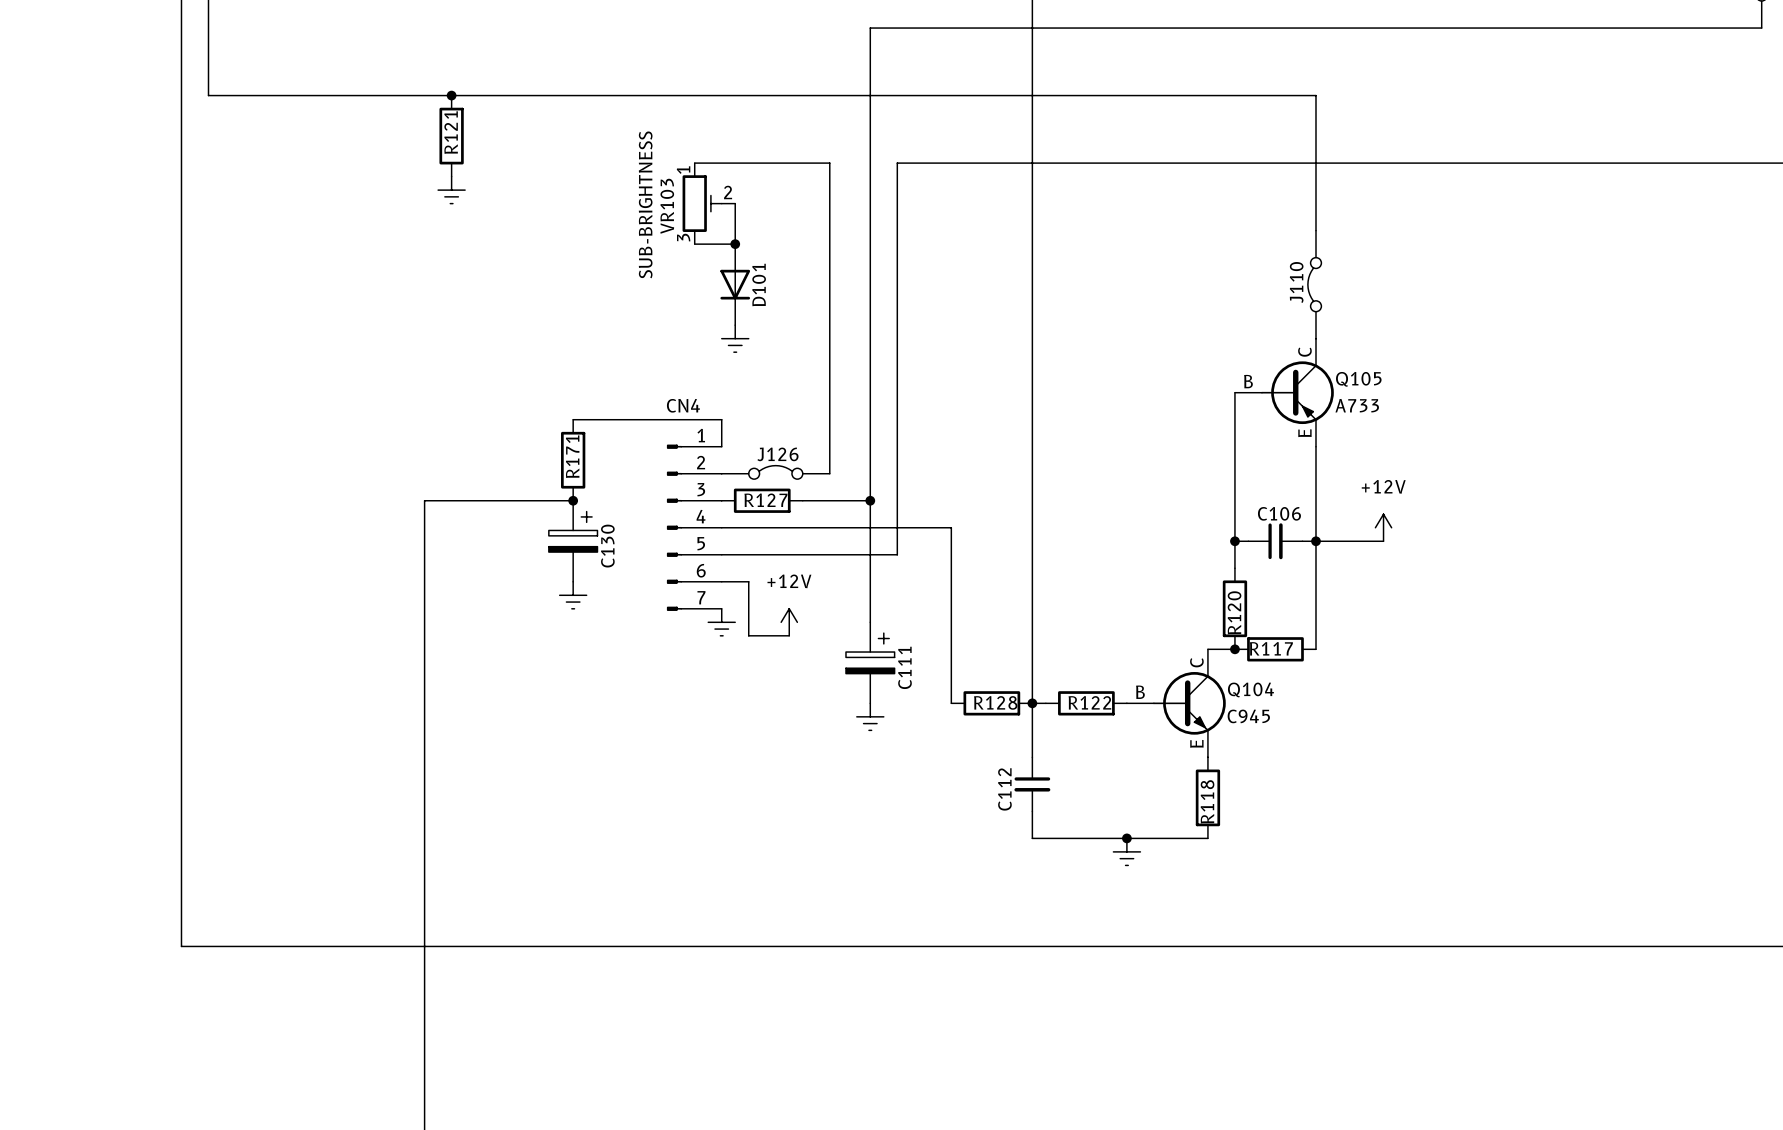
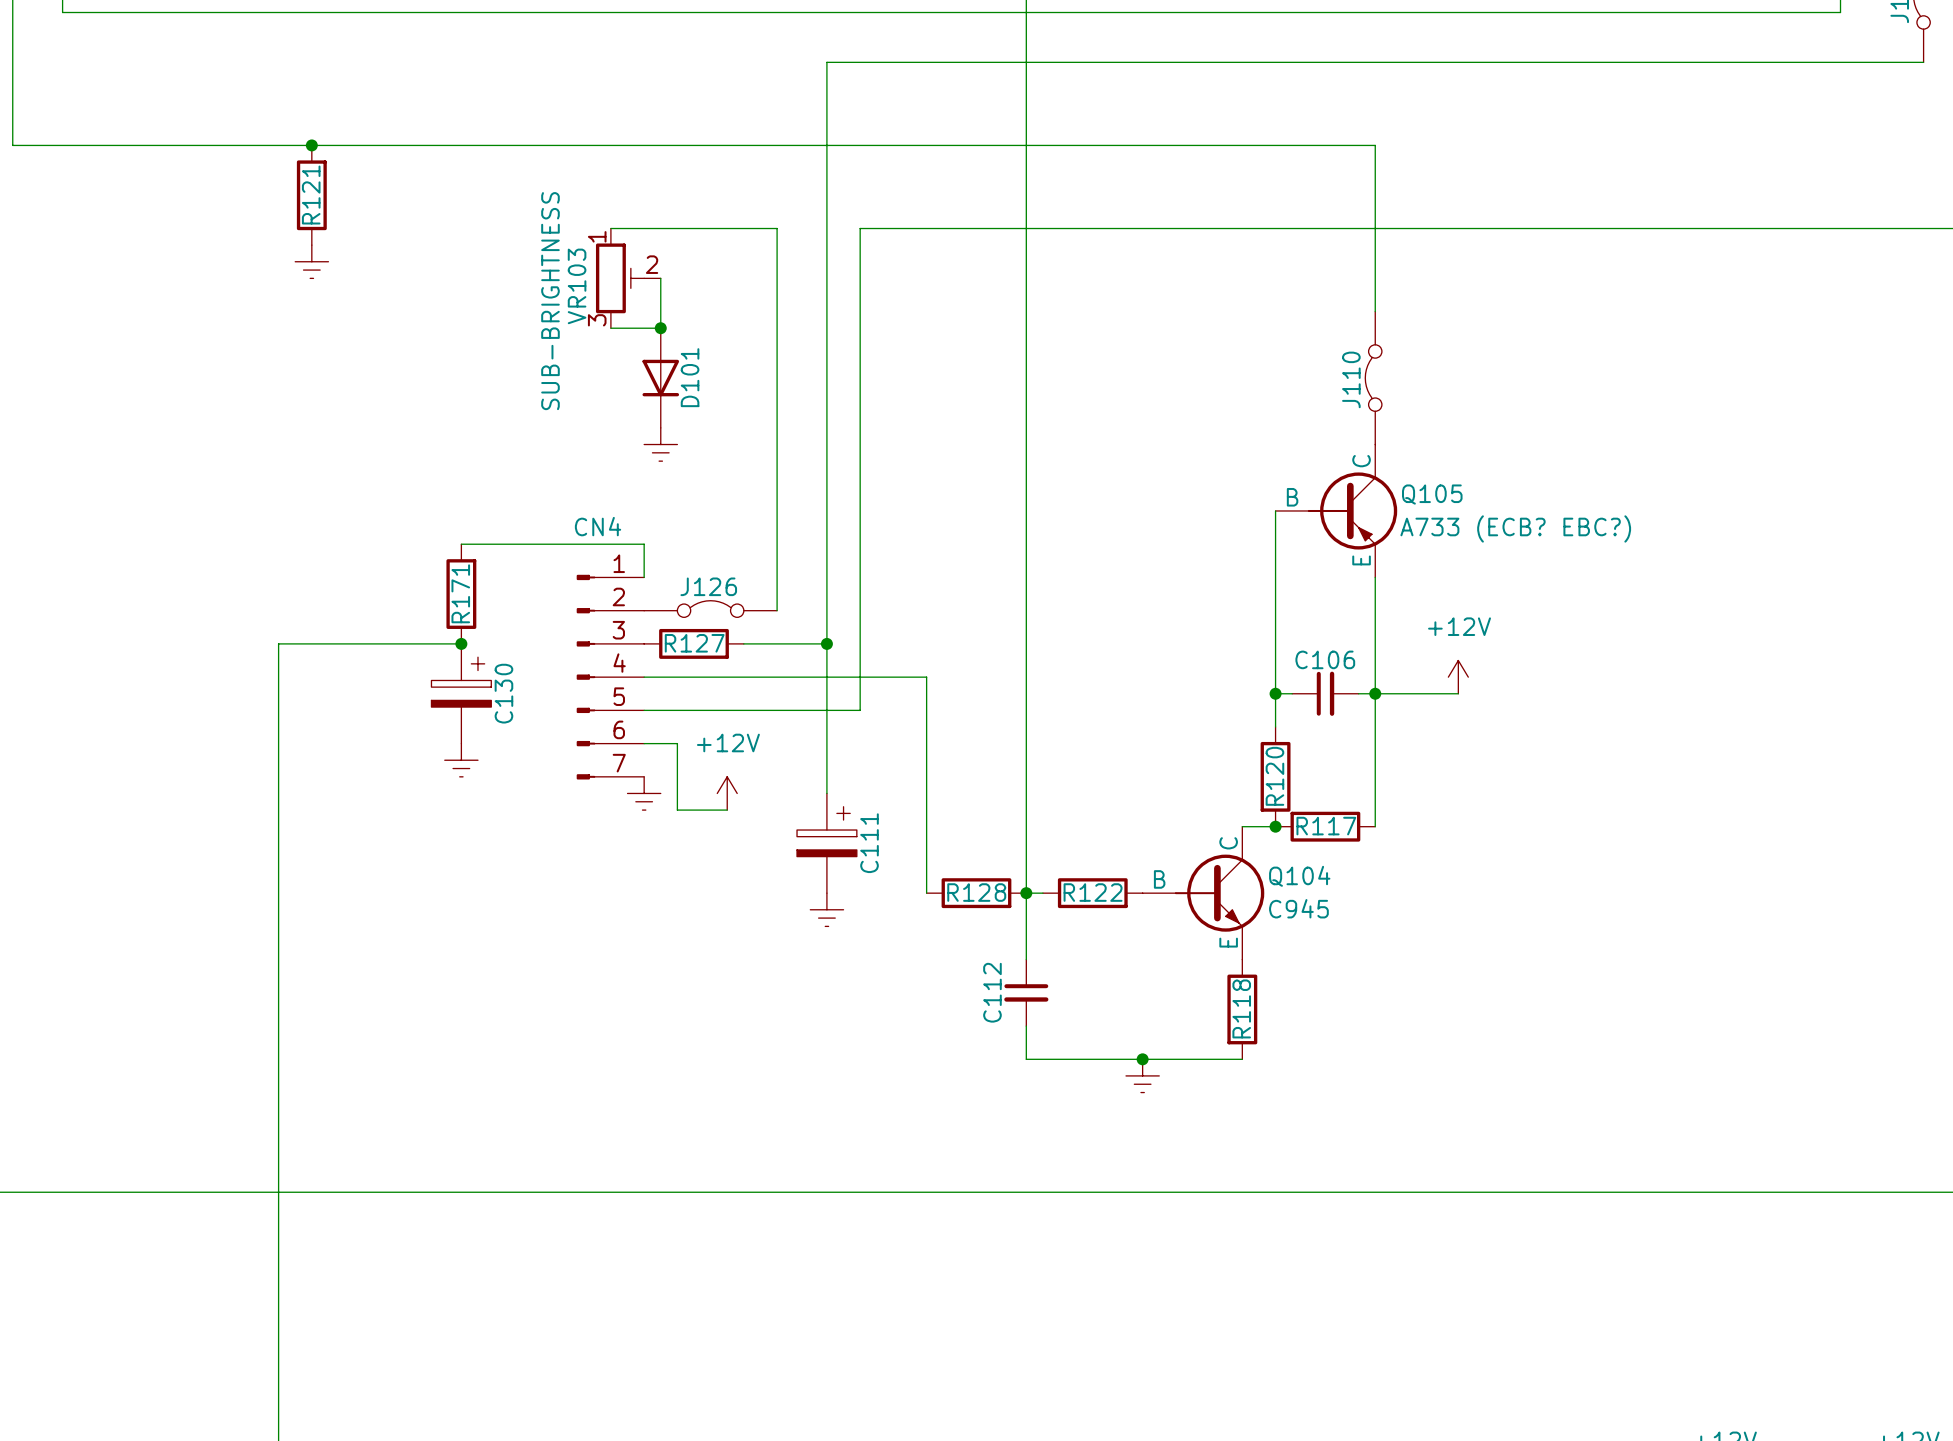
Q105 value: A733 (1357, 405) -> A733 (ECB? EBC?) (1515, 528)

